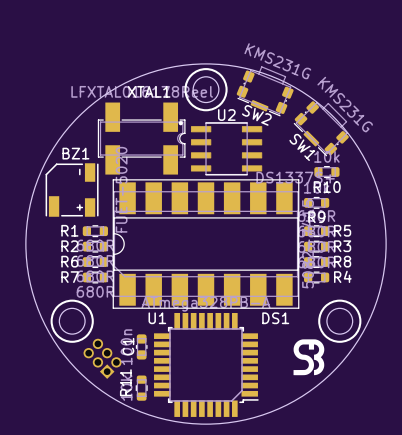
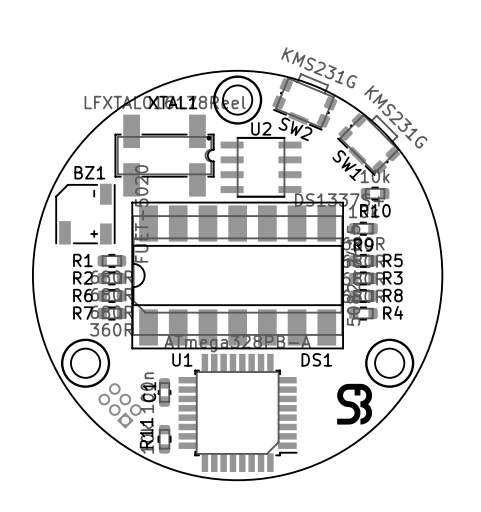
R7 value: 680R (95, 291) -> 360R (111, 329)

